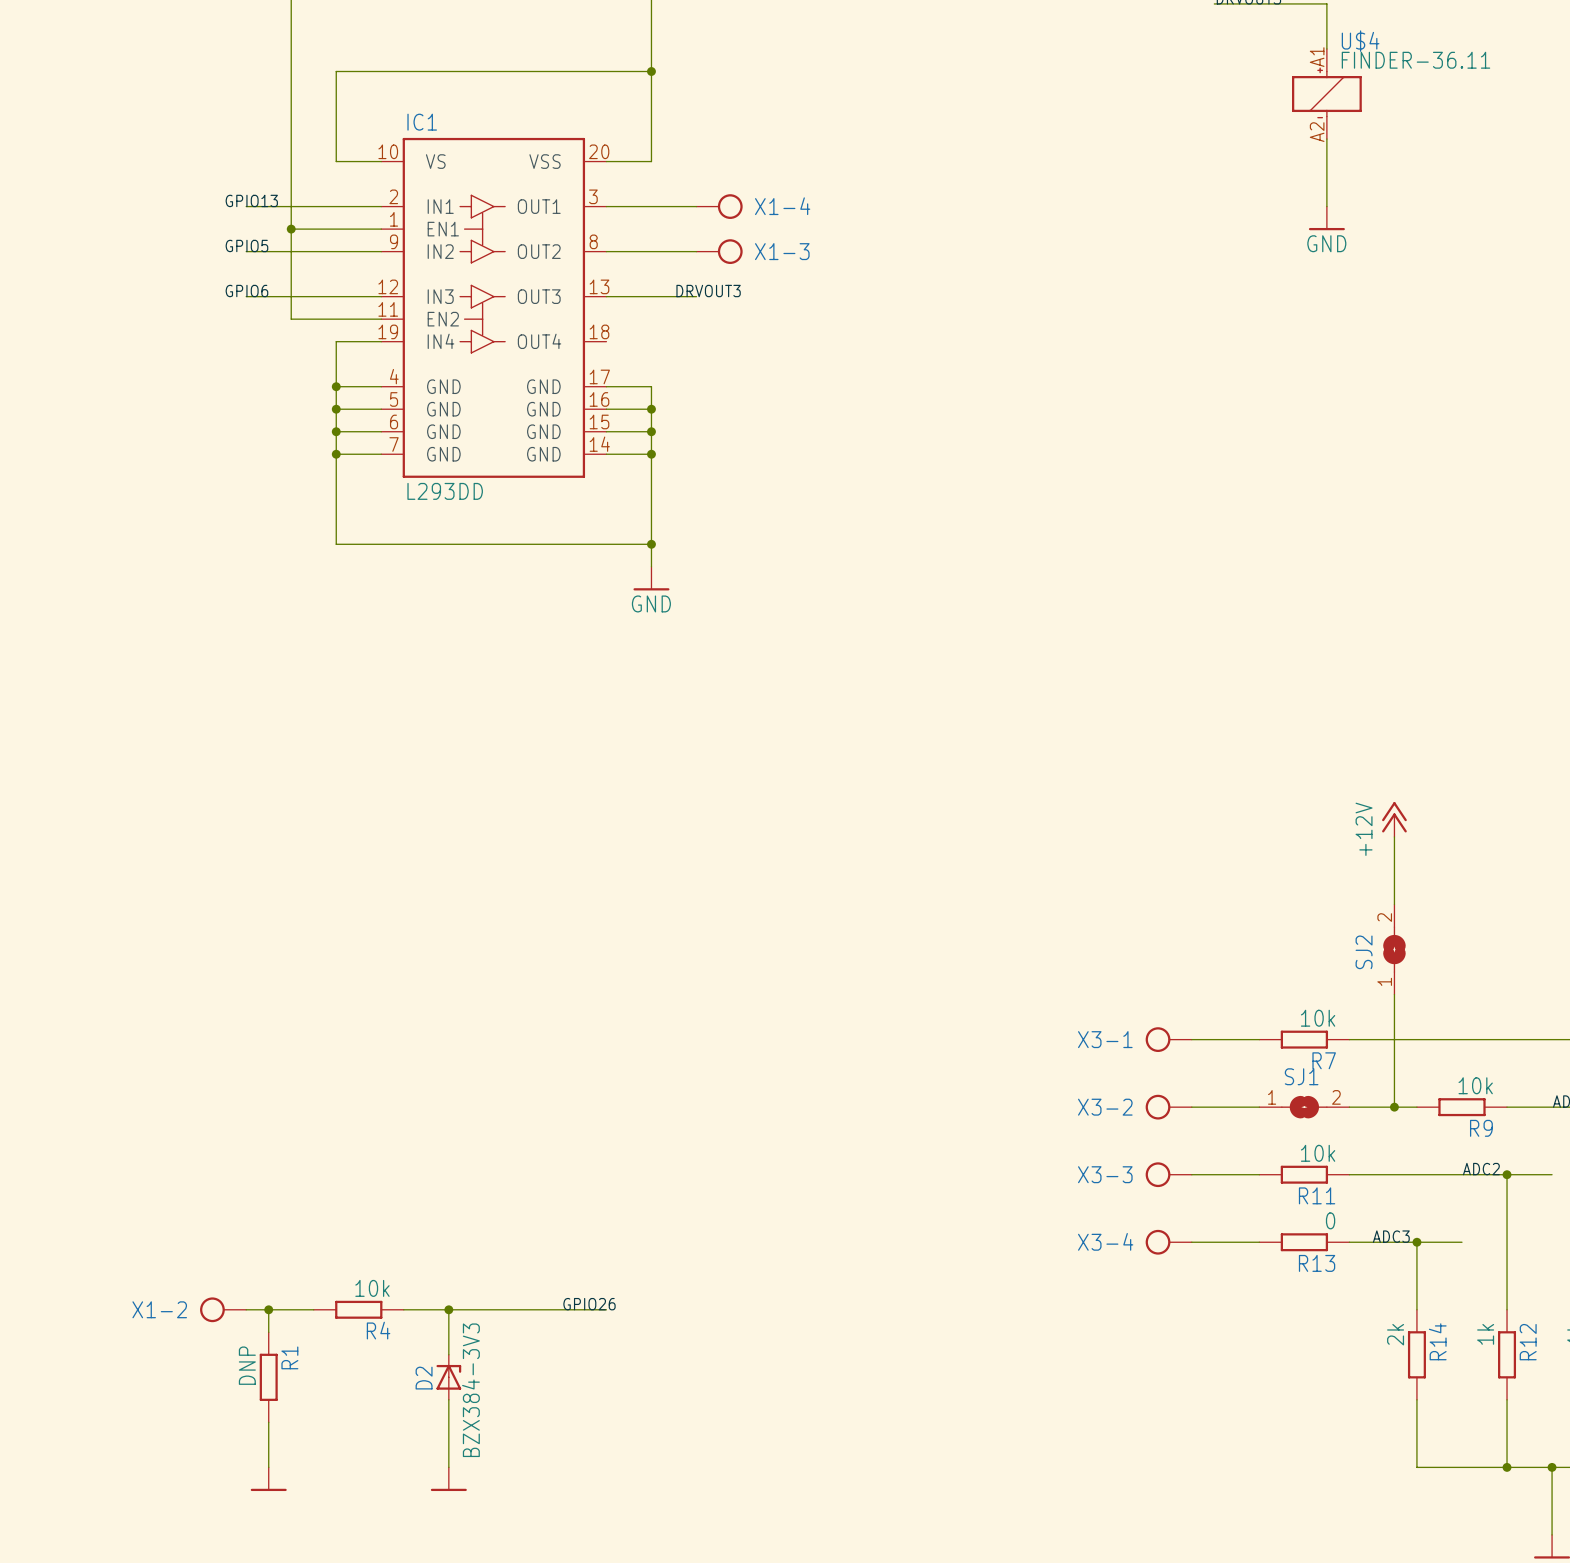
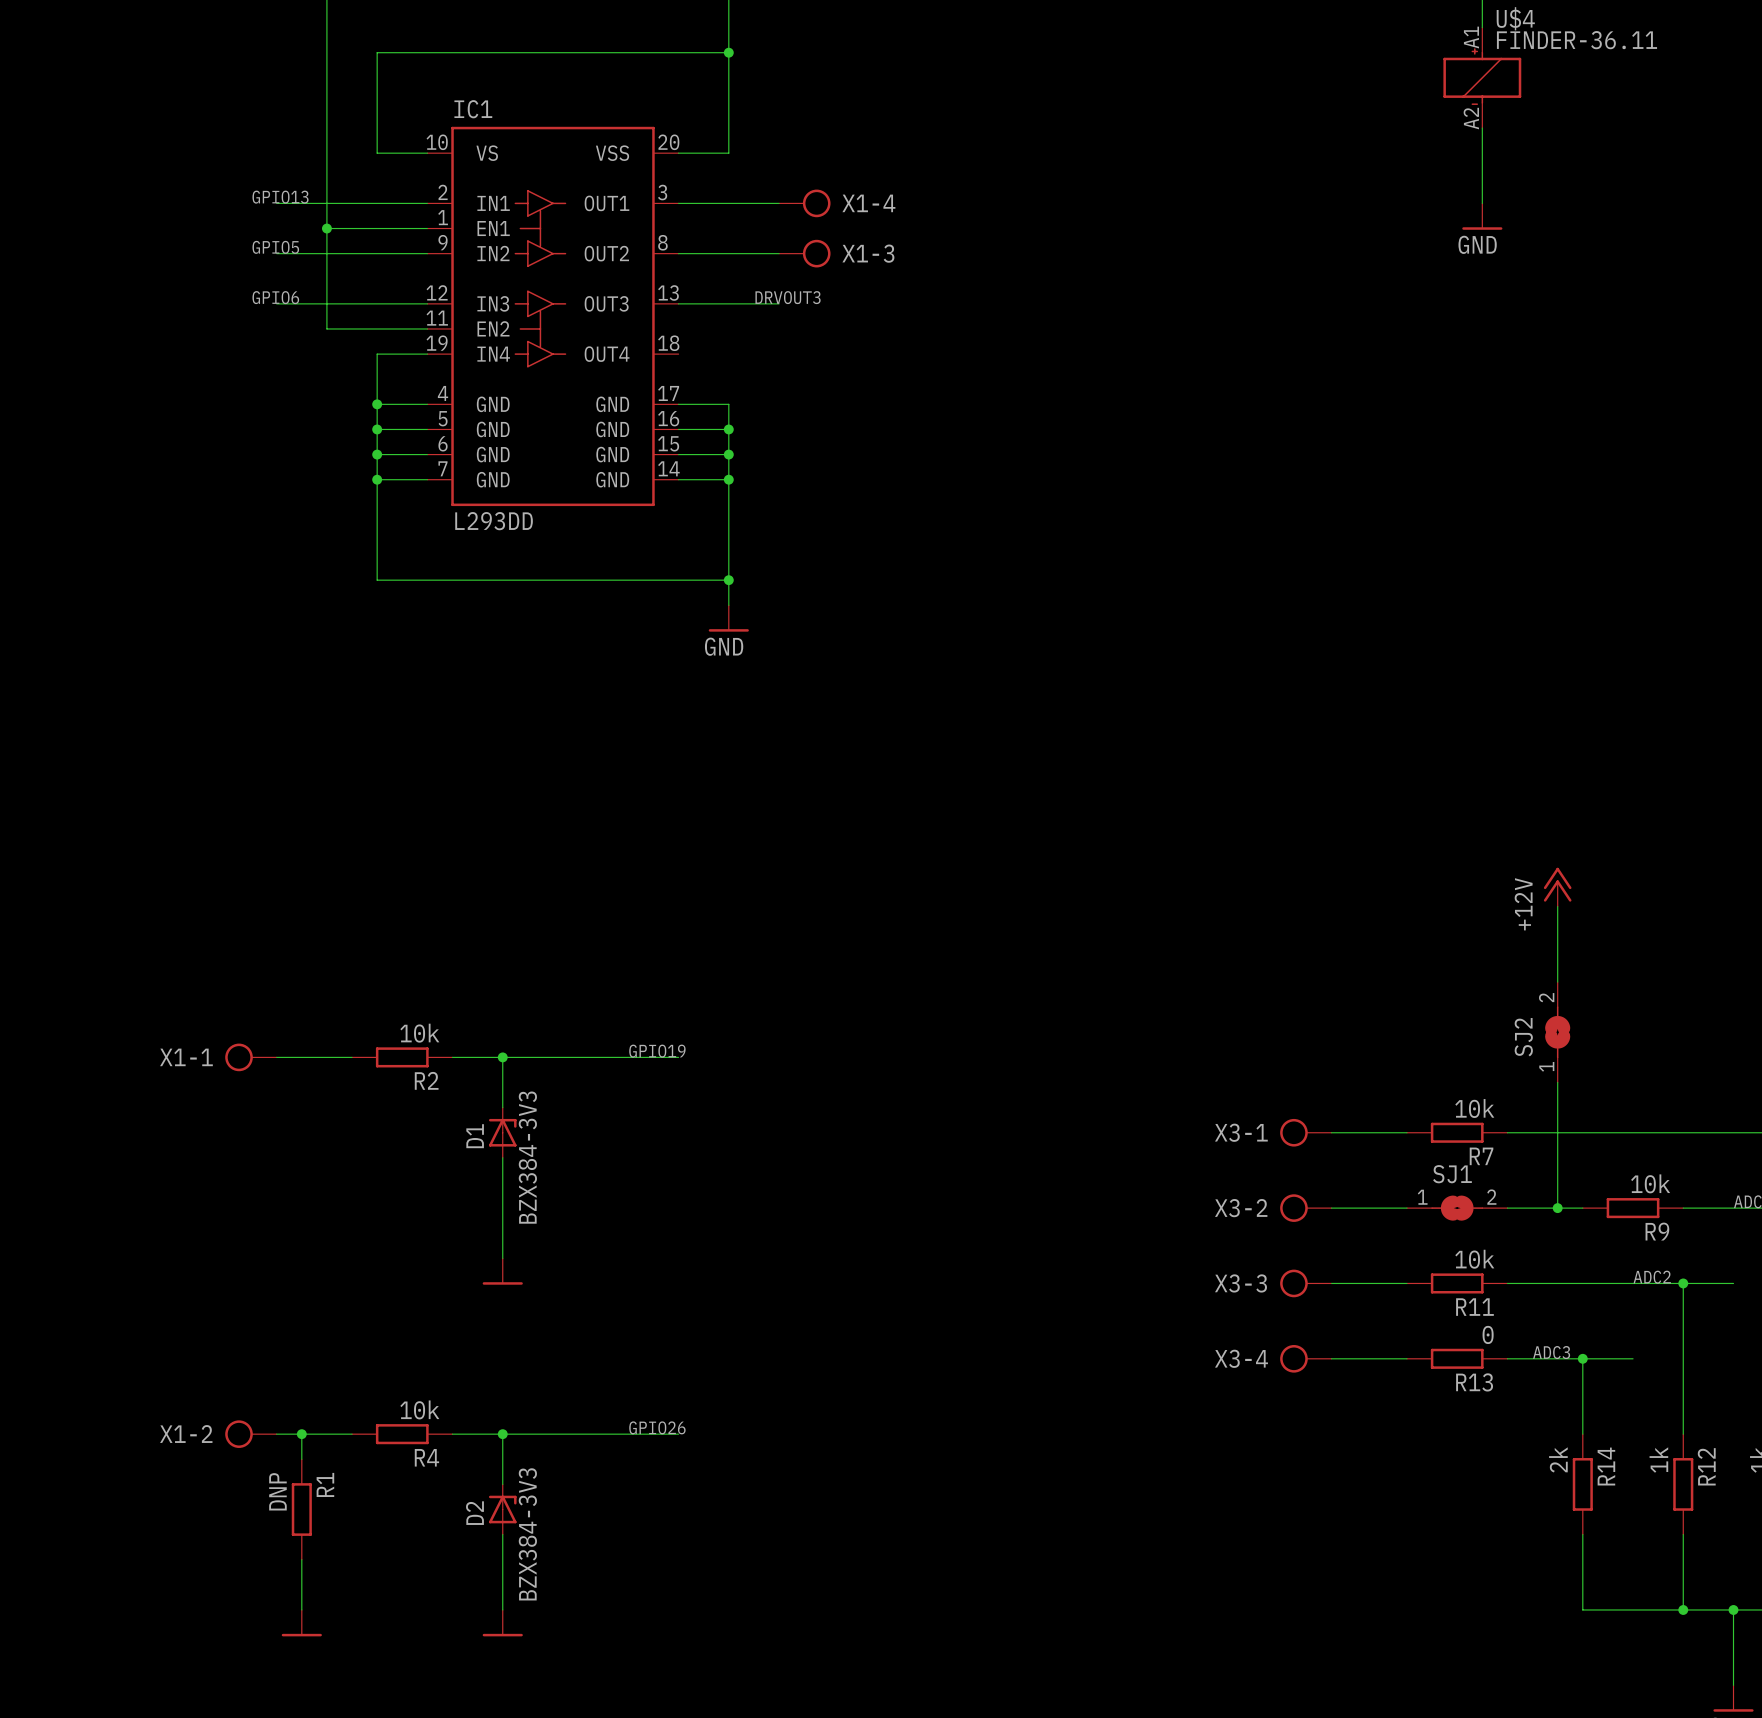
label: none -> GPIO19 (657, 1051)
X1-1: none -> (250, 1057)
wire: none -> (276, 1057) (352, 1057)
R2: none -> 10k (402, 1057)
wire: none -> (452, 1057) (678, 1057)
wire: none -> (502, 1057) (502, 1107)
junction: none -> (502, 1057)
D1: none -> BZX384-3V3 (502, 1132)
wire: none -> (502, 1157) (502, 1258)
power symbol: none -> (502, 1271)

